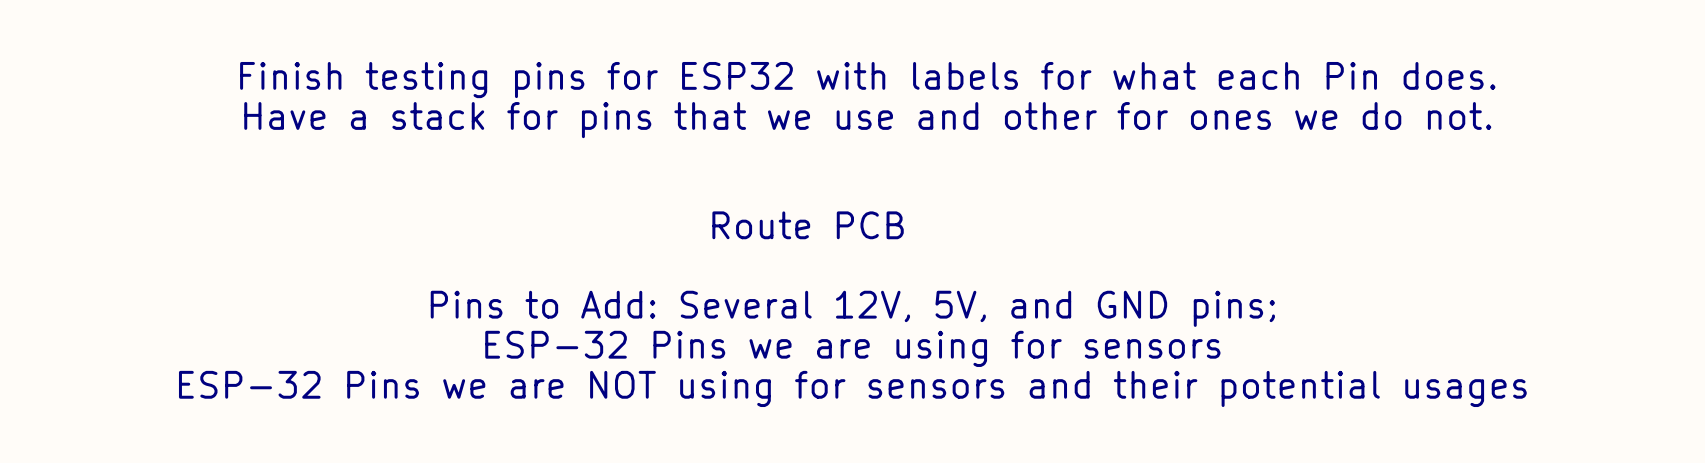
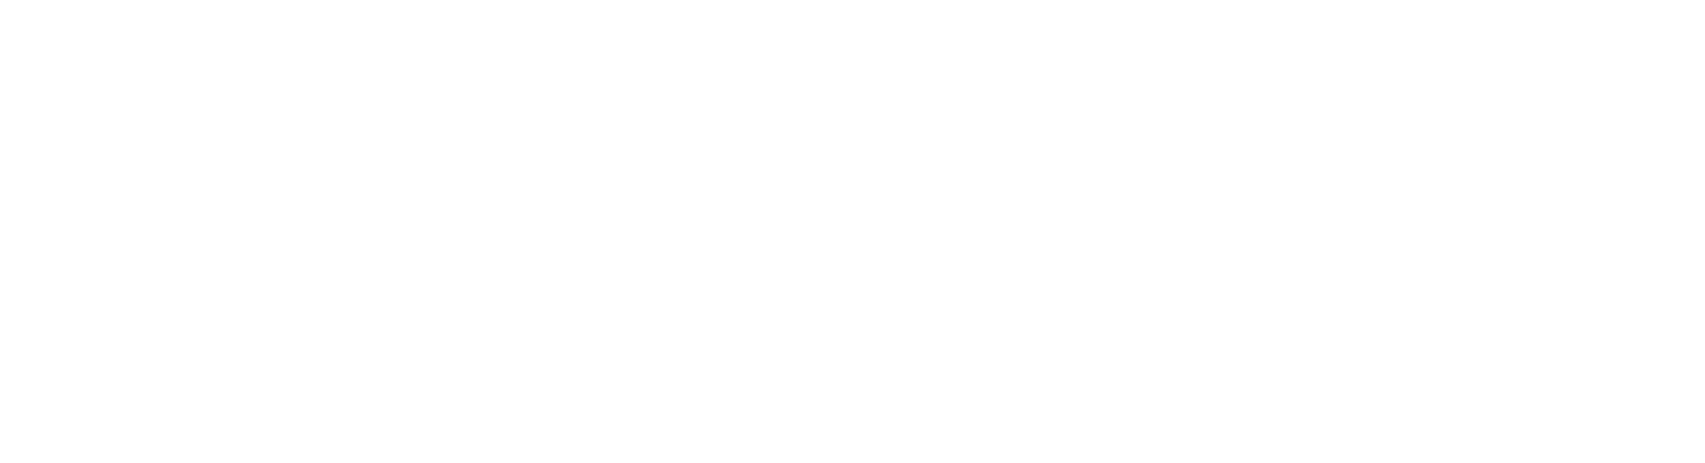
text: Finish testing pins for ESP32 with labels for what each Pin does. (867, 80) -> none
text: Have a stack for pins that we use and other for ones we do not. (867, 120) -> none
text: Route PCB (808, 225) -> none
text: Pins to Add: Several 12V, 5V, and GND pins; (852, 308) -> none
text: ESP-32 Pins we are using for sensors (852, 348) -> none
text: ESP-32 Pins we are NOT using for sensors and their potential usages (852, 388) -> none

